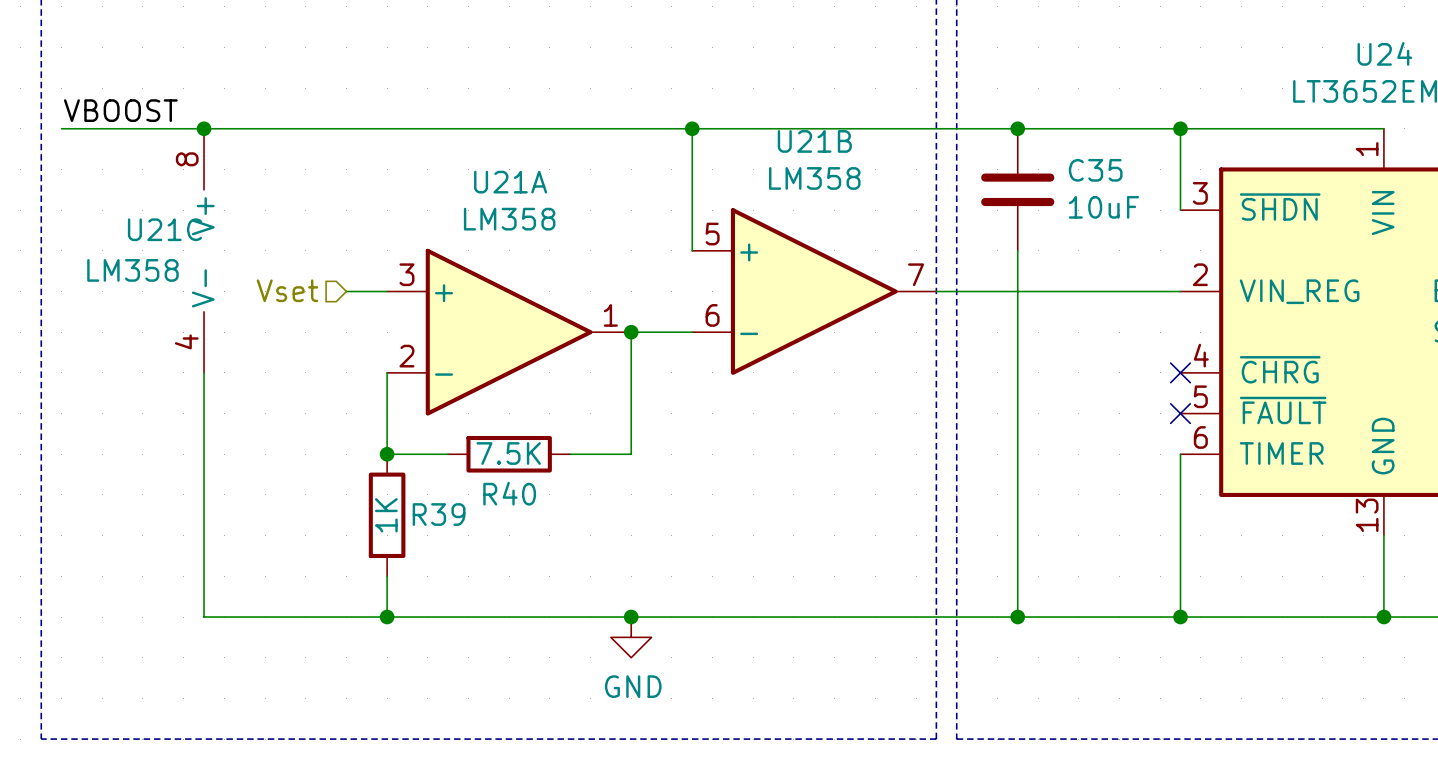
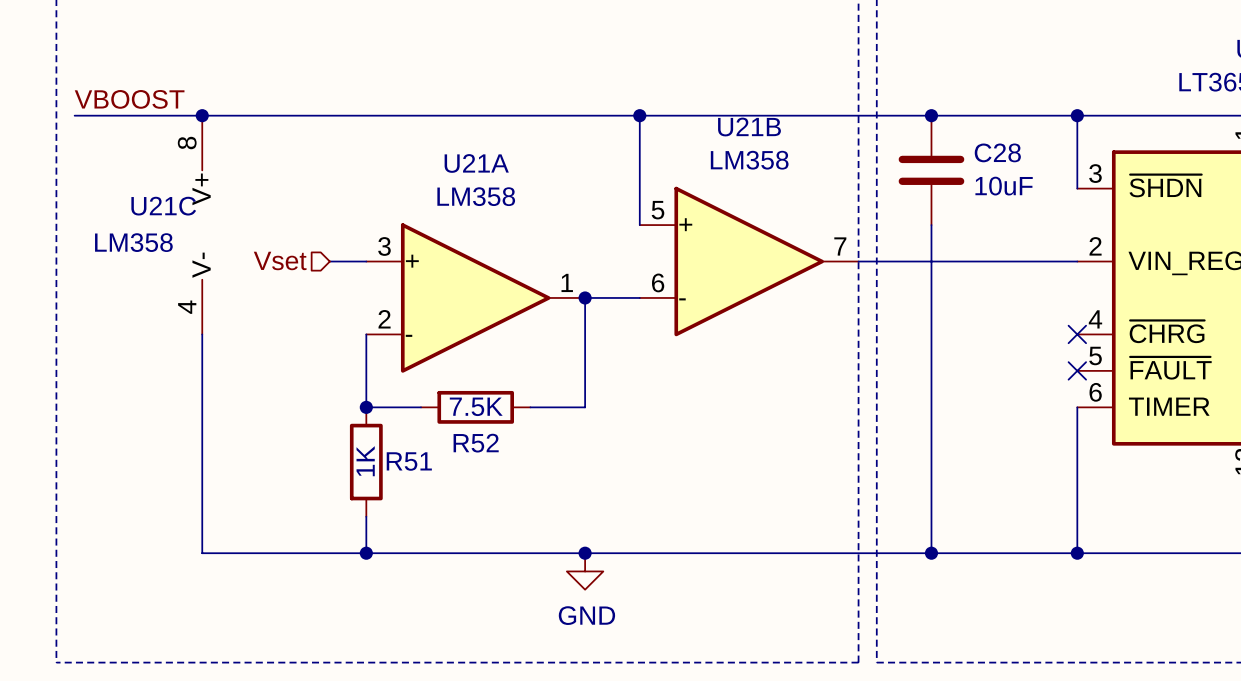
C35 name: C35 (1095, 170) -> C28 (997, 152)
R40 name: R40 (509, 493) -> R52 (476, 443)
R39 name: R39 (439, 514) -> R51 (409, 461)

